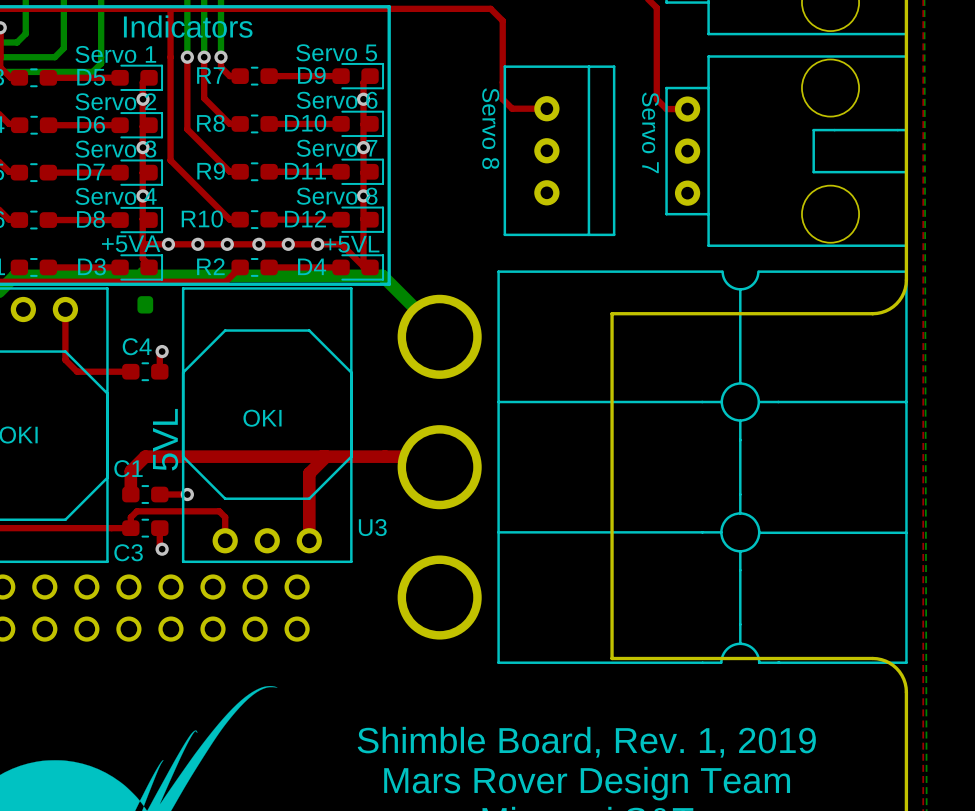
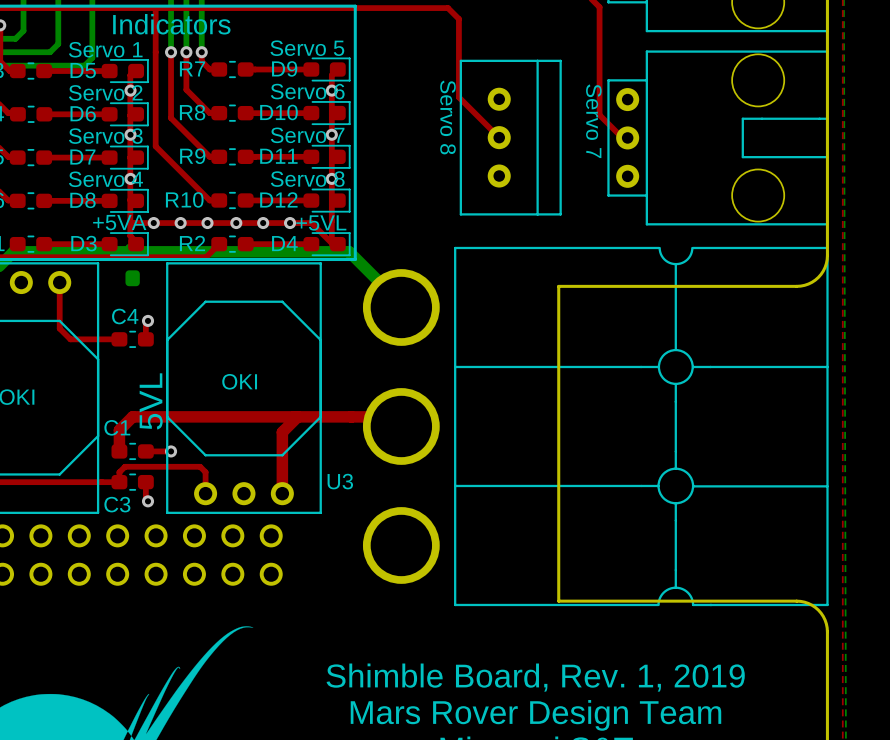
top track: (502, 99) (512, 108) (546, 108) -> (458, 90) (458, 97) (499, 137)
top track: (656, 99) (666, 109) (687, 109) -> (599, 90) (599, 115) (622, 137)

